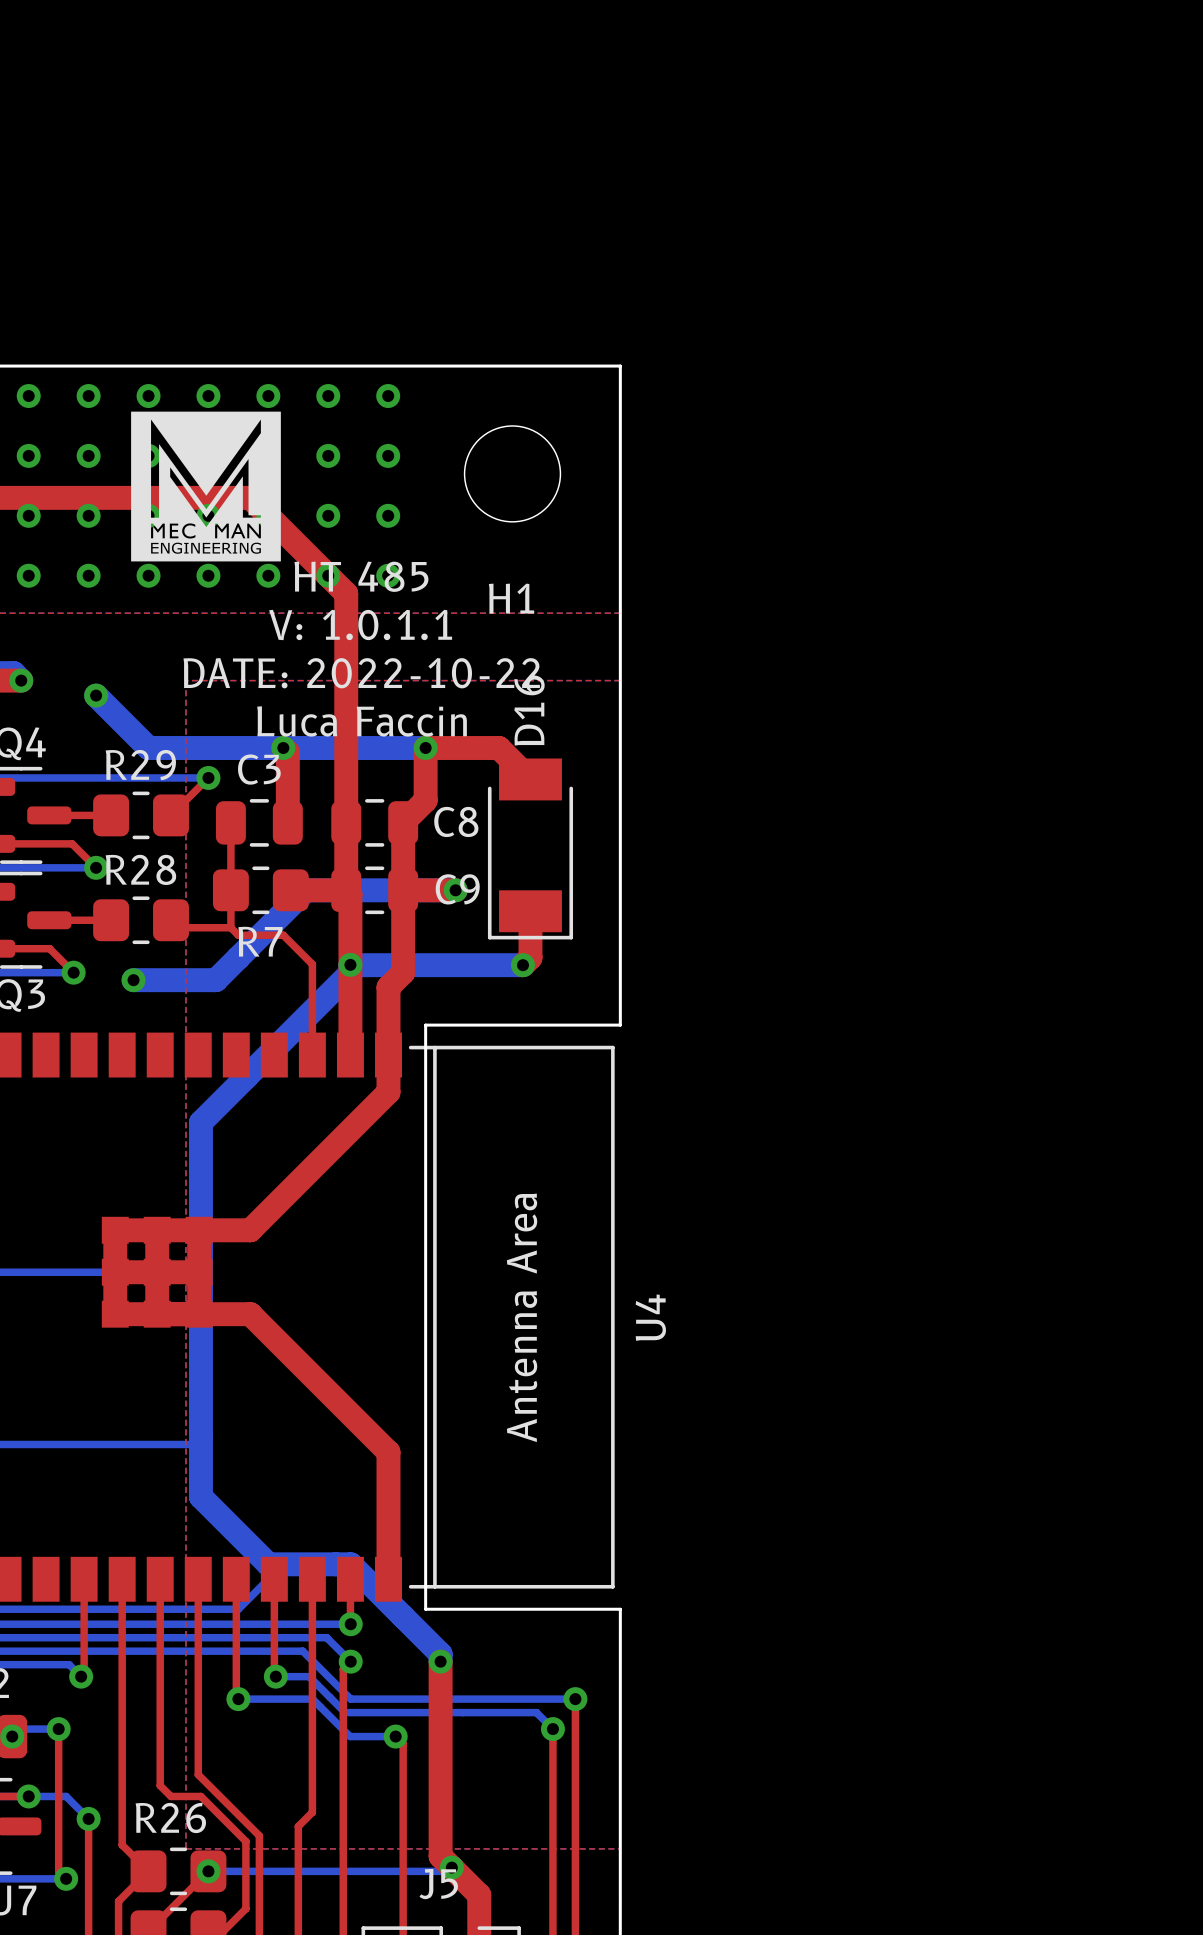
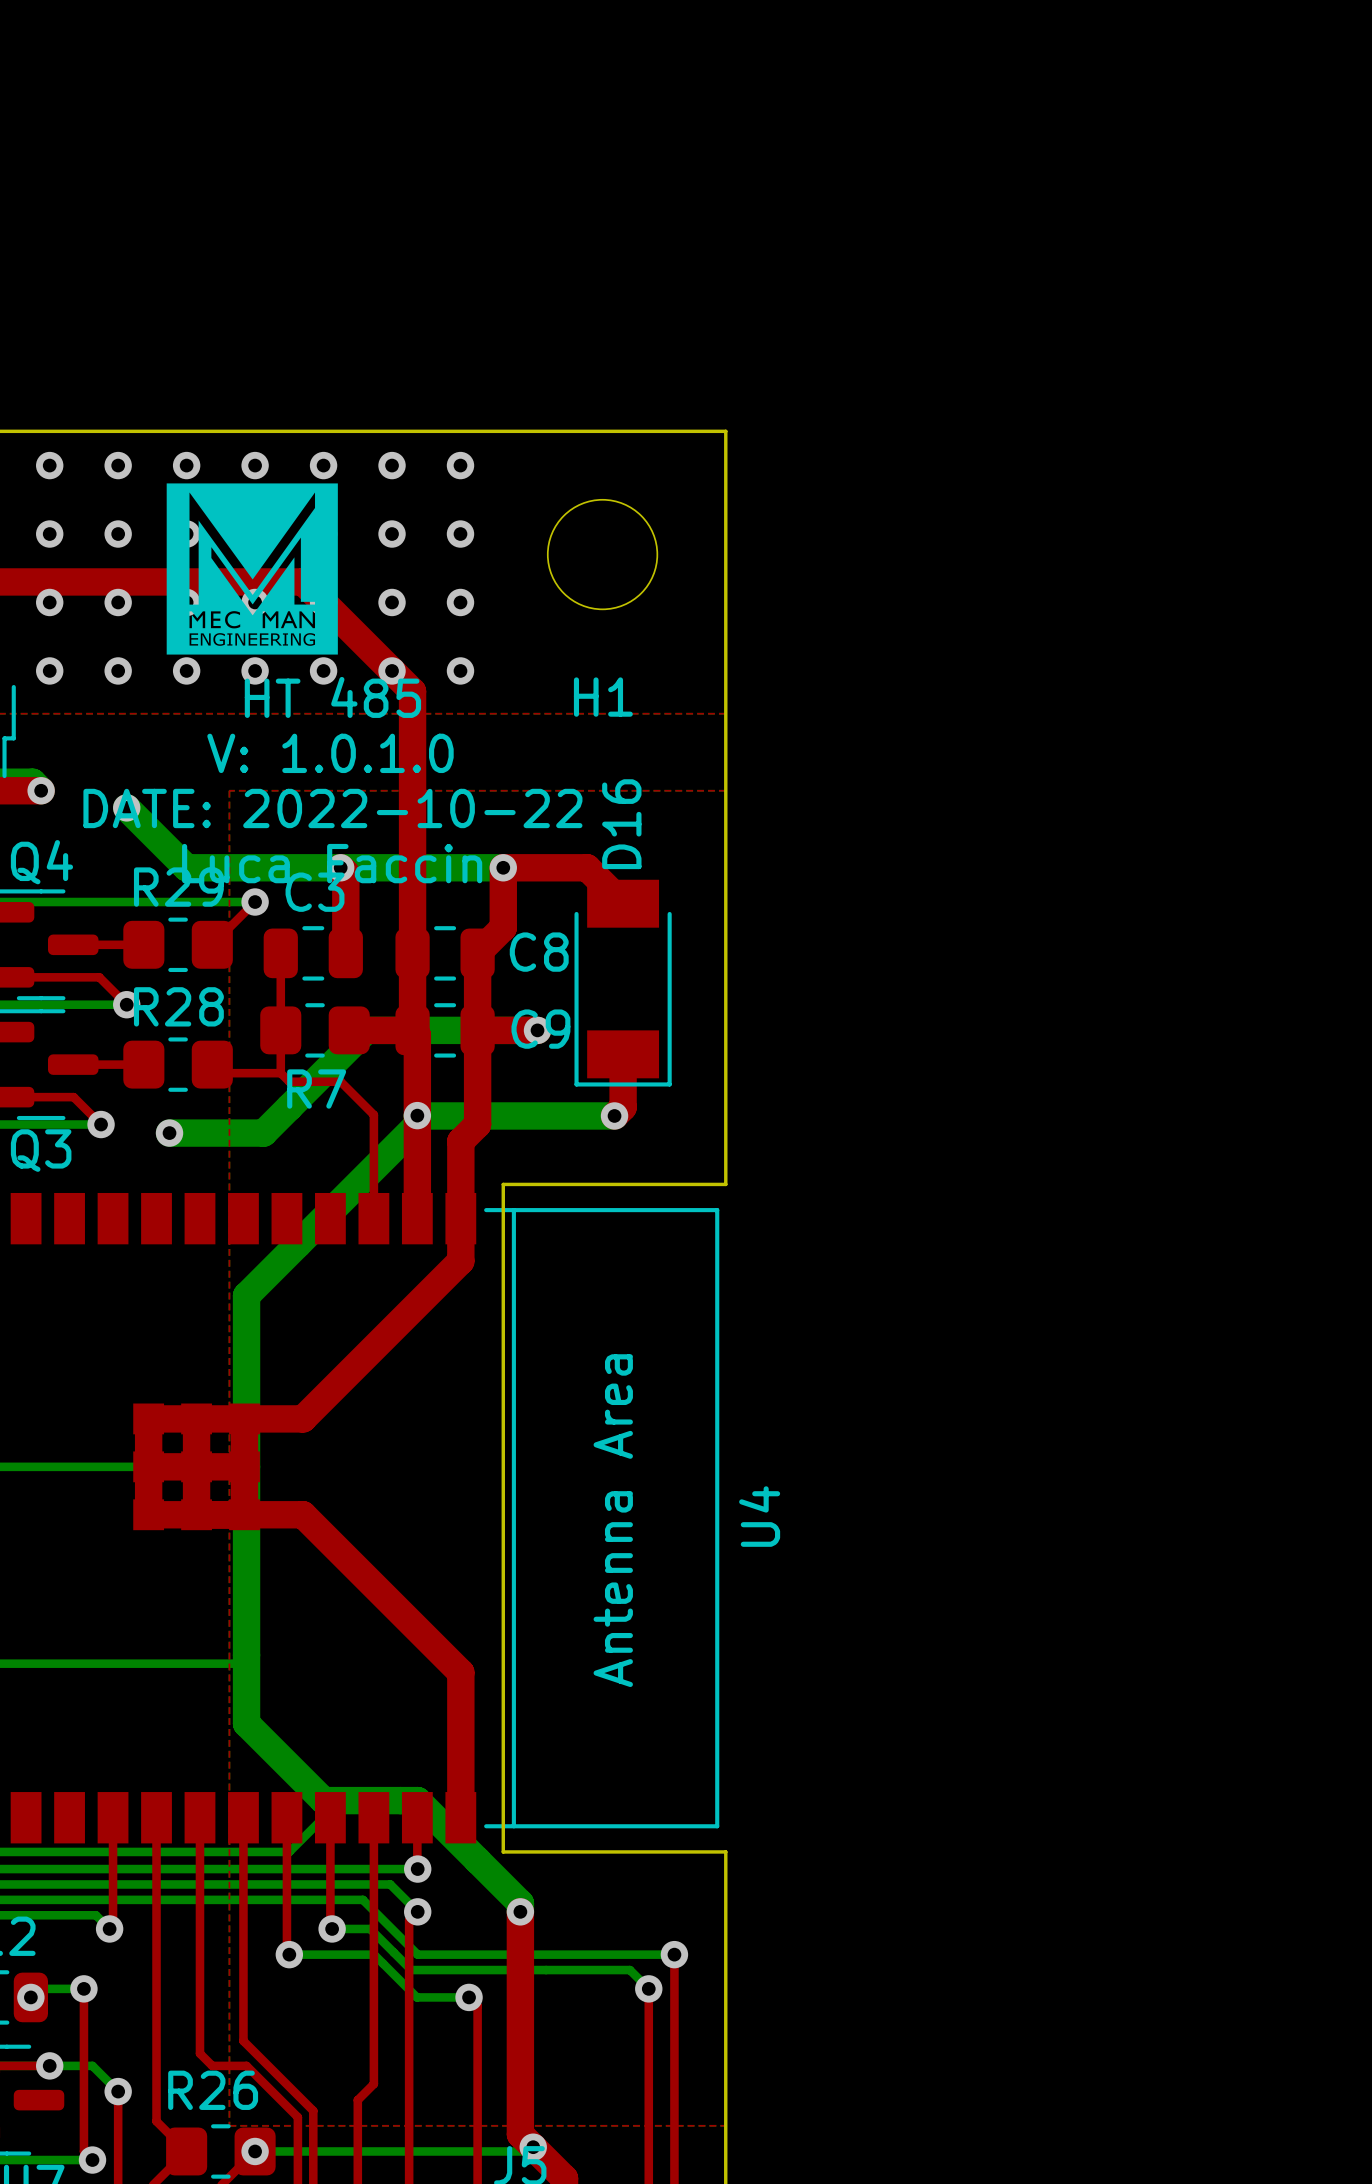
text position: HT 485 (361, 576) -> HT 485 (332, 697)
text: V: 1.0.1.1 (360, 625) -> V: 1.0.1.0 (330, 753)
text position: DATE: 2022-10-22 (361, 673) -> DATE: 2022-10-22 (332, 808)
text position: Luca Faccin (362, 721) -> Luca Faccin (332, 863)

